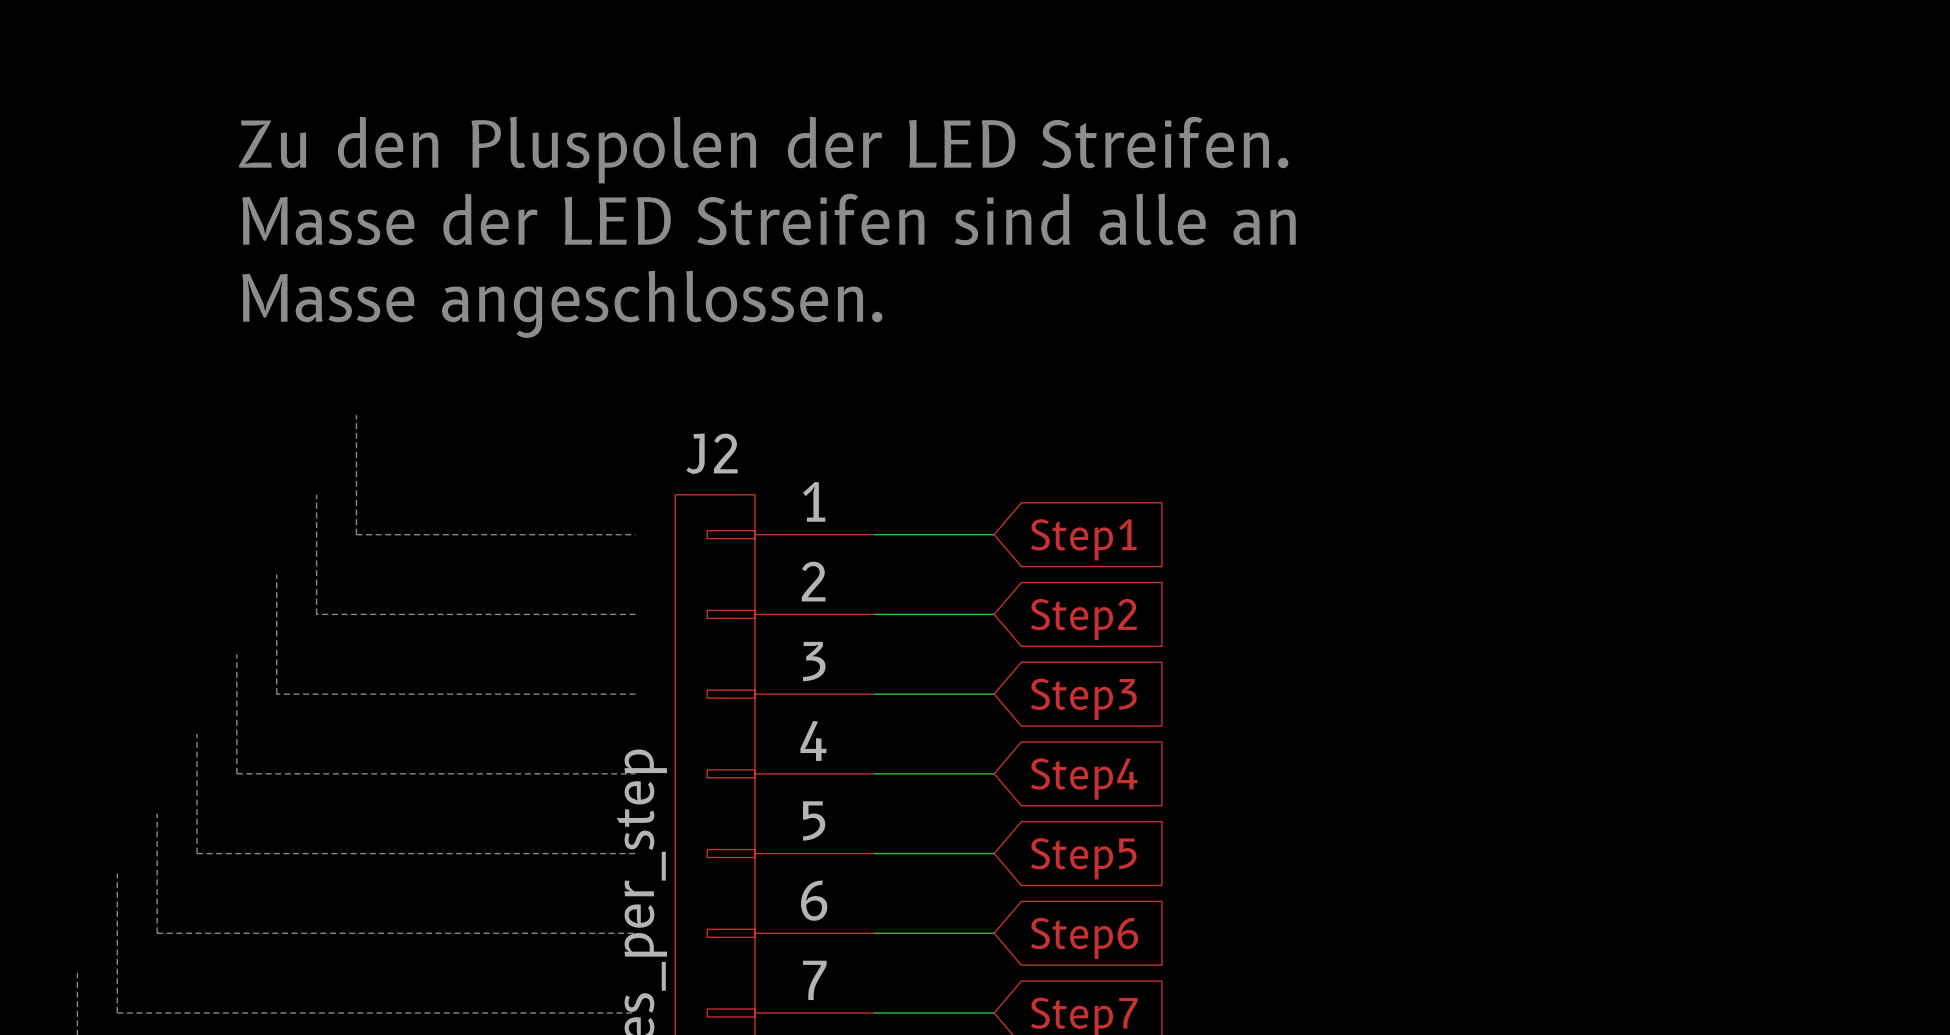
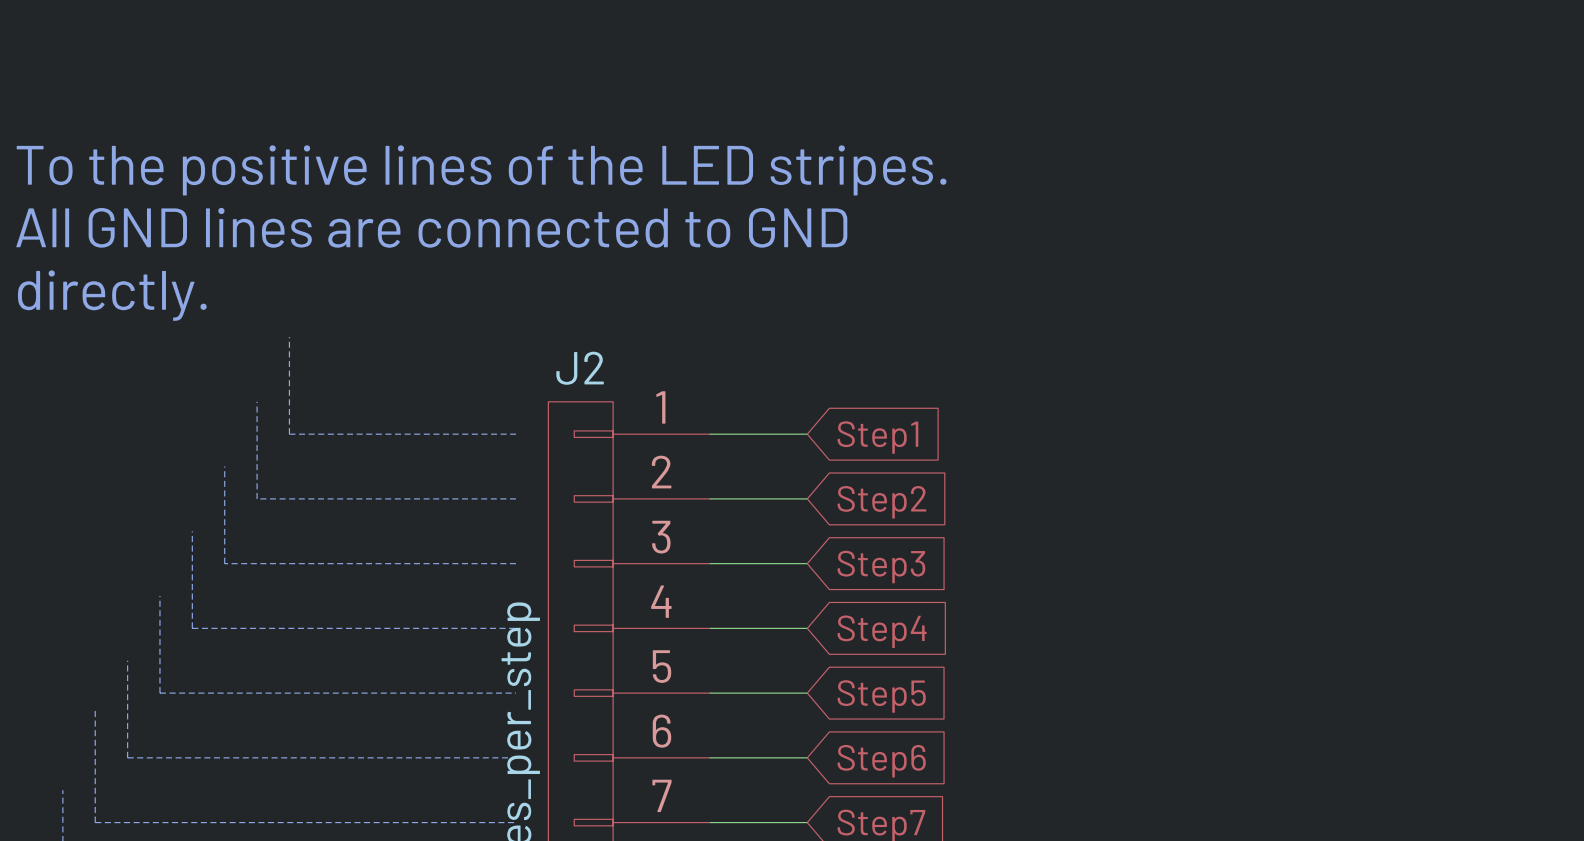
text: Zu den Pluspolen der LED Streifen. (763, 150) -> none
text: none -> To the positive lines of the LED stripes. (481, 170)
text: Masse der LED Streifen sind alle an (769, 219) -> none
text: none -> All GND lines are connected to GND (431, 227)
text: Masse angeschlossen. (562, 304) -> none
text: none -> directly. (112, 295)

